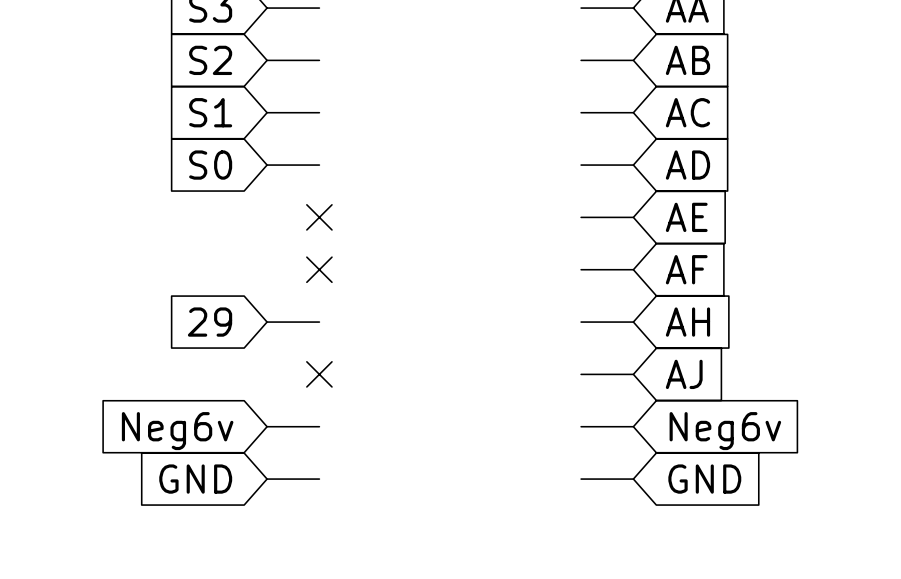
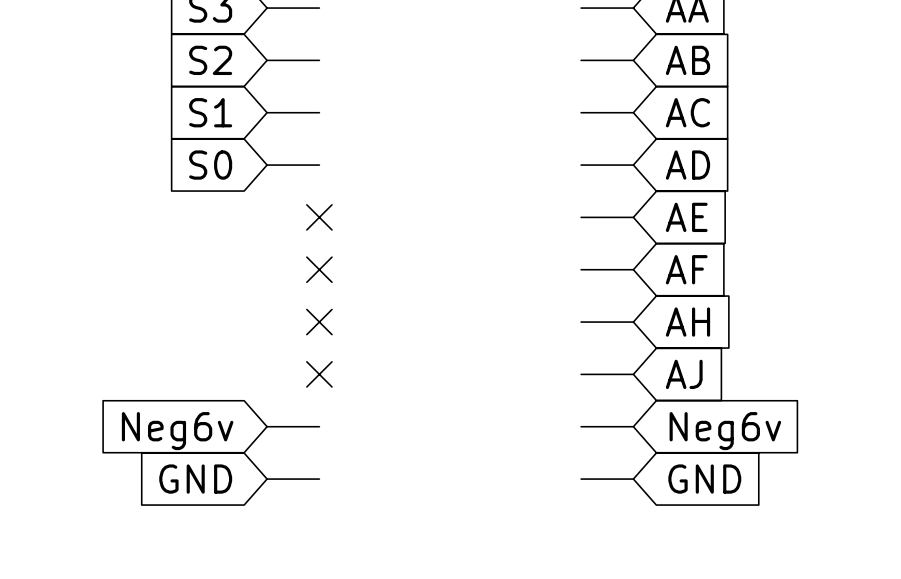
global label: 29 (210, 322) -> none
wire: (267, 322) (319, 322) -> none
no-connect mark: none -> (319, 322)

